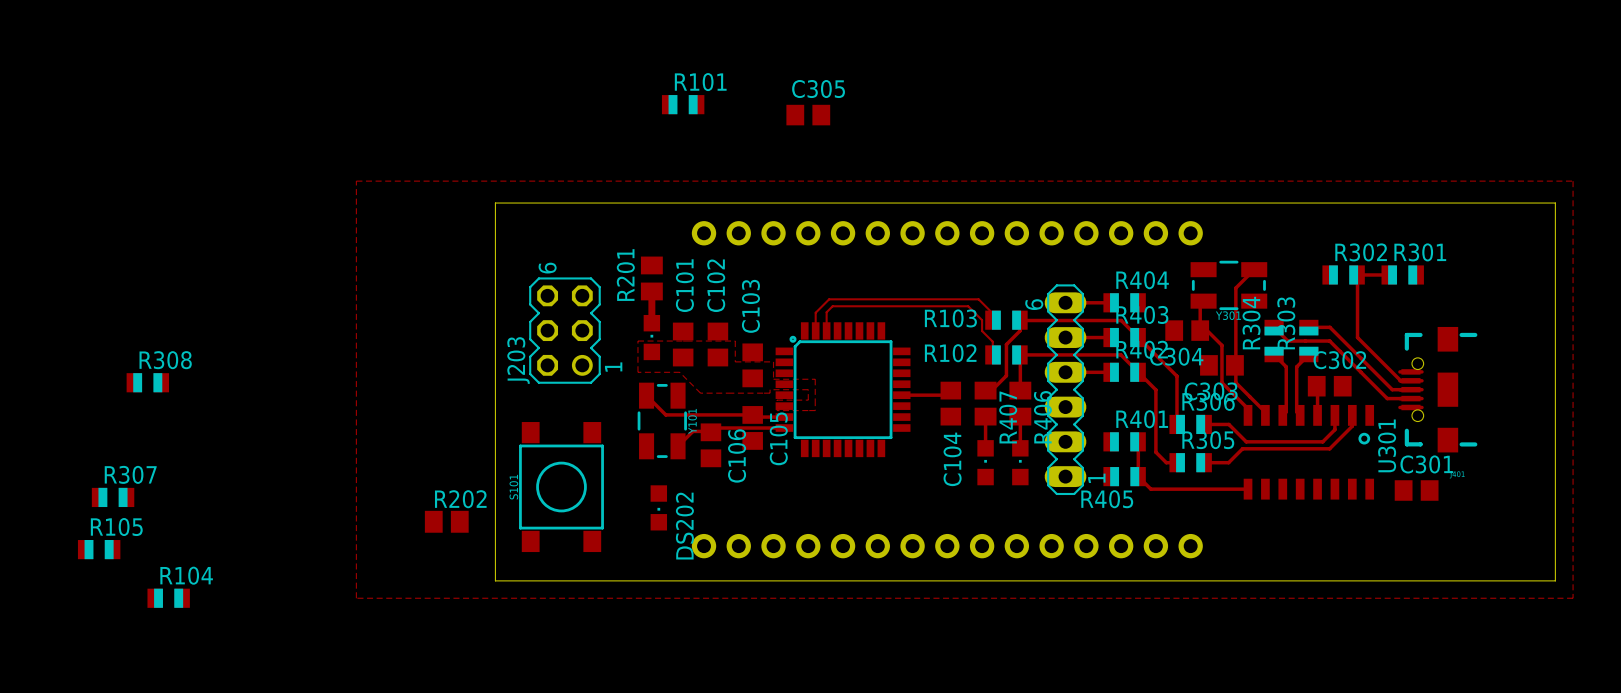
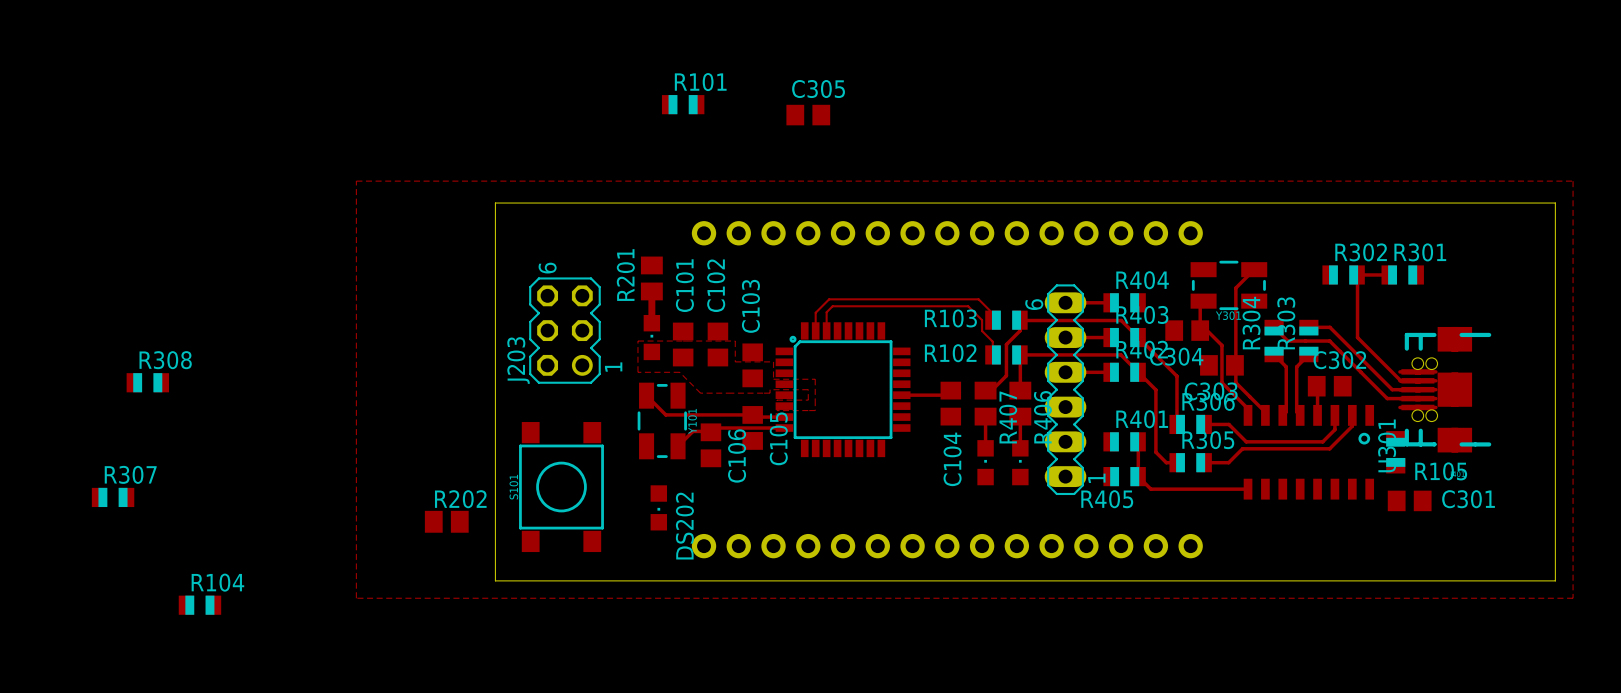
part: none -> (1451, 389)
C301 name position: C301 (1426, 464) -> C301 (1468, 499)
C301 position: (1416, 490) -> (1409, 500)
R105 name position: R105 (116, 527) -> R105 (1441, 471)
R105 rotation: 0° (99, 549) -> 90° clockwise (1395, 452)
R105 position: (99, 549) -> (1395, 452)
R104 position: (168, 598) -> (199, 605)

